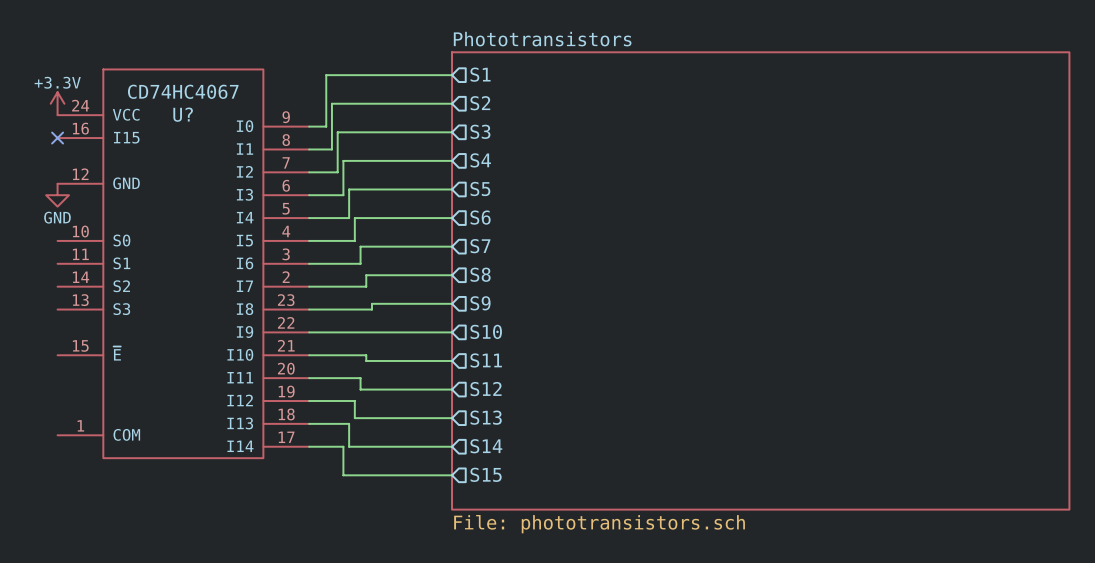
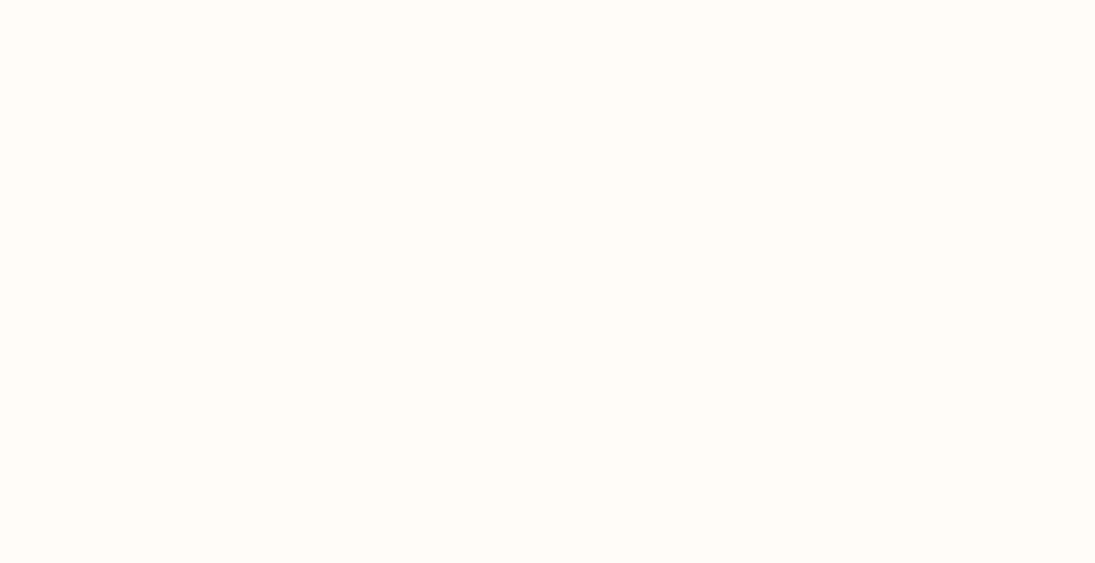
sheet pin: S1 (480, 74) -> none
wire: (452, 75) (326, 75) (326, 126) (309, 126) -> none
power symbol: +3.3V (57, 103) -> none
wire: (452, 103) (331, 103) (331, 149) (309, 149) -> none
sheet pin: S2 (480, 103) -> none
sheet pin: S3 (480, 131) -> none
wire: (452, 132) (337, 132) (337, 172) (309, 172) -> none
no-connect mark: (57, 138) -> none
wire: (452, 160) (343, 160) (343, 195) (309, 195) -> none
sheet pin: S4 (480, 160) -> none
sheet pin: S5 (480, 188) -> none
wire: (452, 189) (349, 189) (349, 218) (309, 218) -> none
power symbol: GND (57, 195) -> none
sheet pin: S6 (480, 217) -> none
wire: (452, 218) (354, 218) (354, 240) (309, 240) -> none
wire: (452, 246) (360, 246) (360, 263) (309, 263) -> none
sheet pin: S7 (480, 246) -> none
U?: CD74HC4067 (183, 263) -> none
sheet pin: S8 (480, 274) -> none
wire: (452, 275) (366, 275) (366, 286) (309, 286) -> none
sheet Phototransistors: File: phototransistors.sch (760, 280) -> none
wire: (452, 303) (371, 303) (371, 309) (309, 309) -> none
sheet pin: S9 (480, 303) -> none
sheet pin: S10 (486, 331) -> none
wire: (309, 332) (452, 332) -> none
wire: (309, 355) (366, 355) (366, 360) (452, 360) -> none
sheet pin: S11 (486, 360) -> none
wire: (309, 378) (360, 378) (360, 389) (452, 389) -> none
sheet pin: S12 (486, 389) -> none
wire: (309, 401) (354, 401) (354, 418) (452, 418) -> none
sheet pin: S13 (486, 417) -> none
wire: (309, 423) (349, 423) (349, 446) (452, 446) -> none
wire: (309, 446) (343, 446) (343, 475) (452, 475) -> none
sheet pin: S14 (486, 446) -> none
sheet pin: S15 (486, 474) -> none

